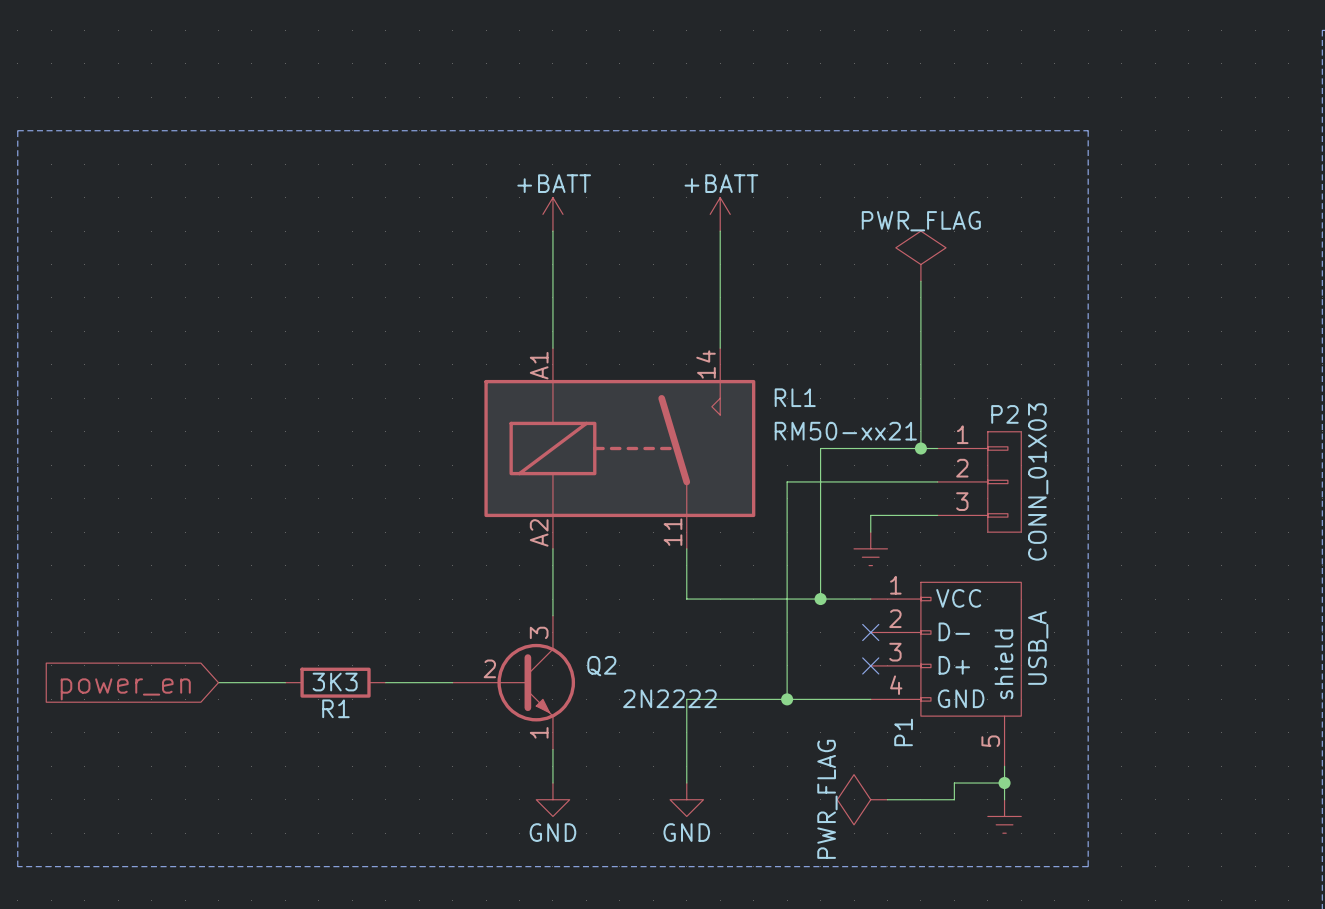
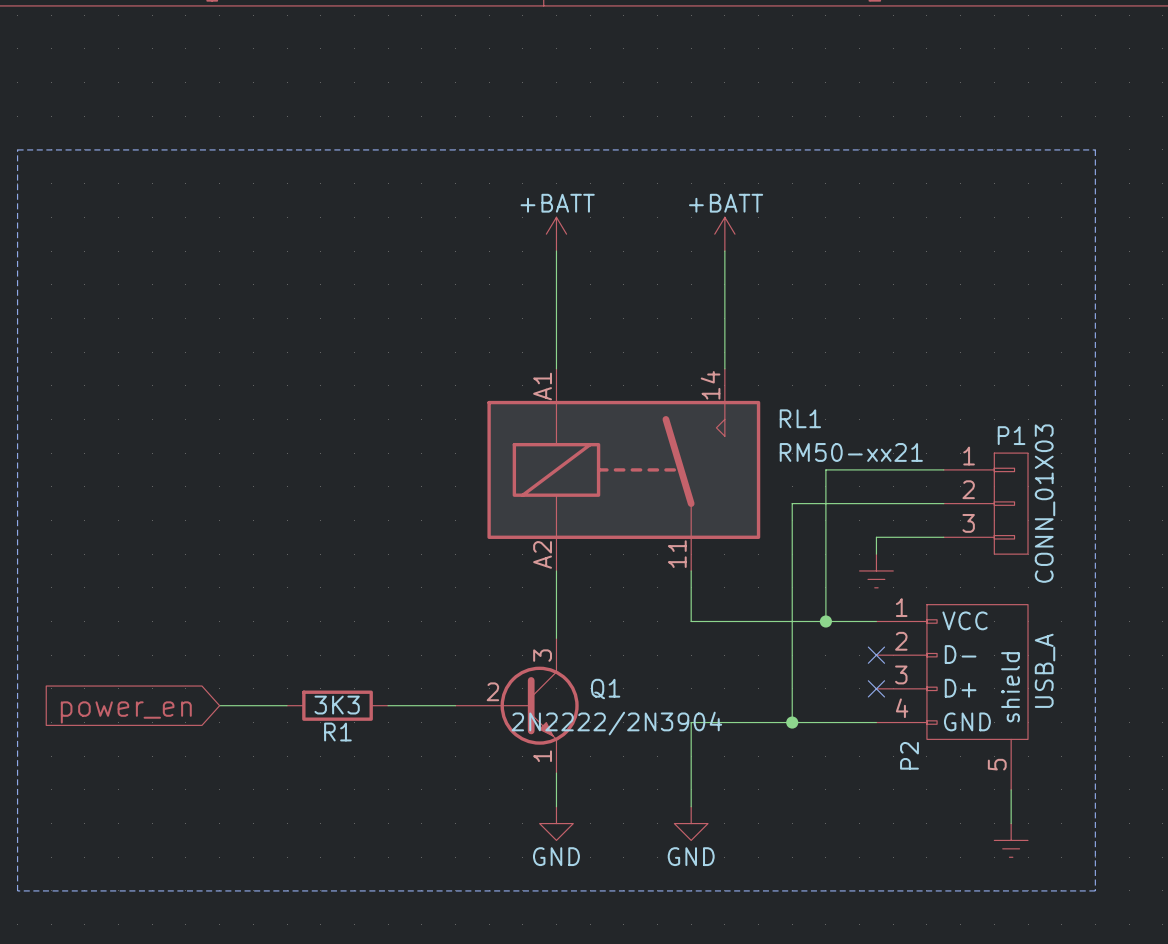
power symbol: PWR_FLAG (920, 256) -> none
wire: (920, 281) (920, 448) -> none
P2 name: P2 (1004, 414) -> P1 (1011, 435)
junction: (920, 448) -> none
Q2 name: Q2 (601, 666) -> Q1 (605, 689)
Q2 value: 2N2222 (669, 698) -> 2N2222/2N3904 (616, 723)
P1 name: P1 (903, 732) -> P2 (909, 755)
wire: (1004, 783) (954, 783) (954, 799) (887, 799) -> none
junction: (1004, 783) -> none
power symbol: PWR_FLAG (862, 799) -> none

